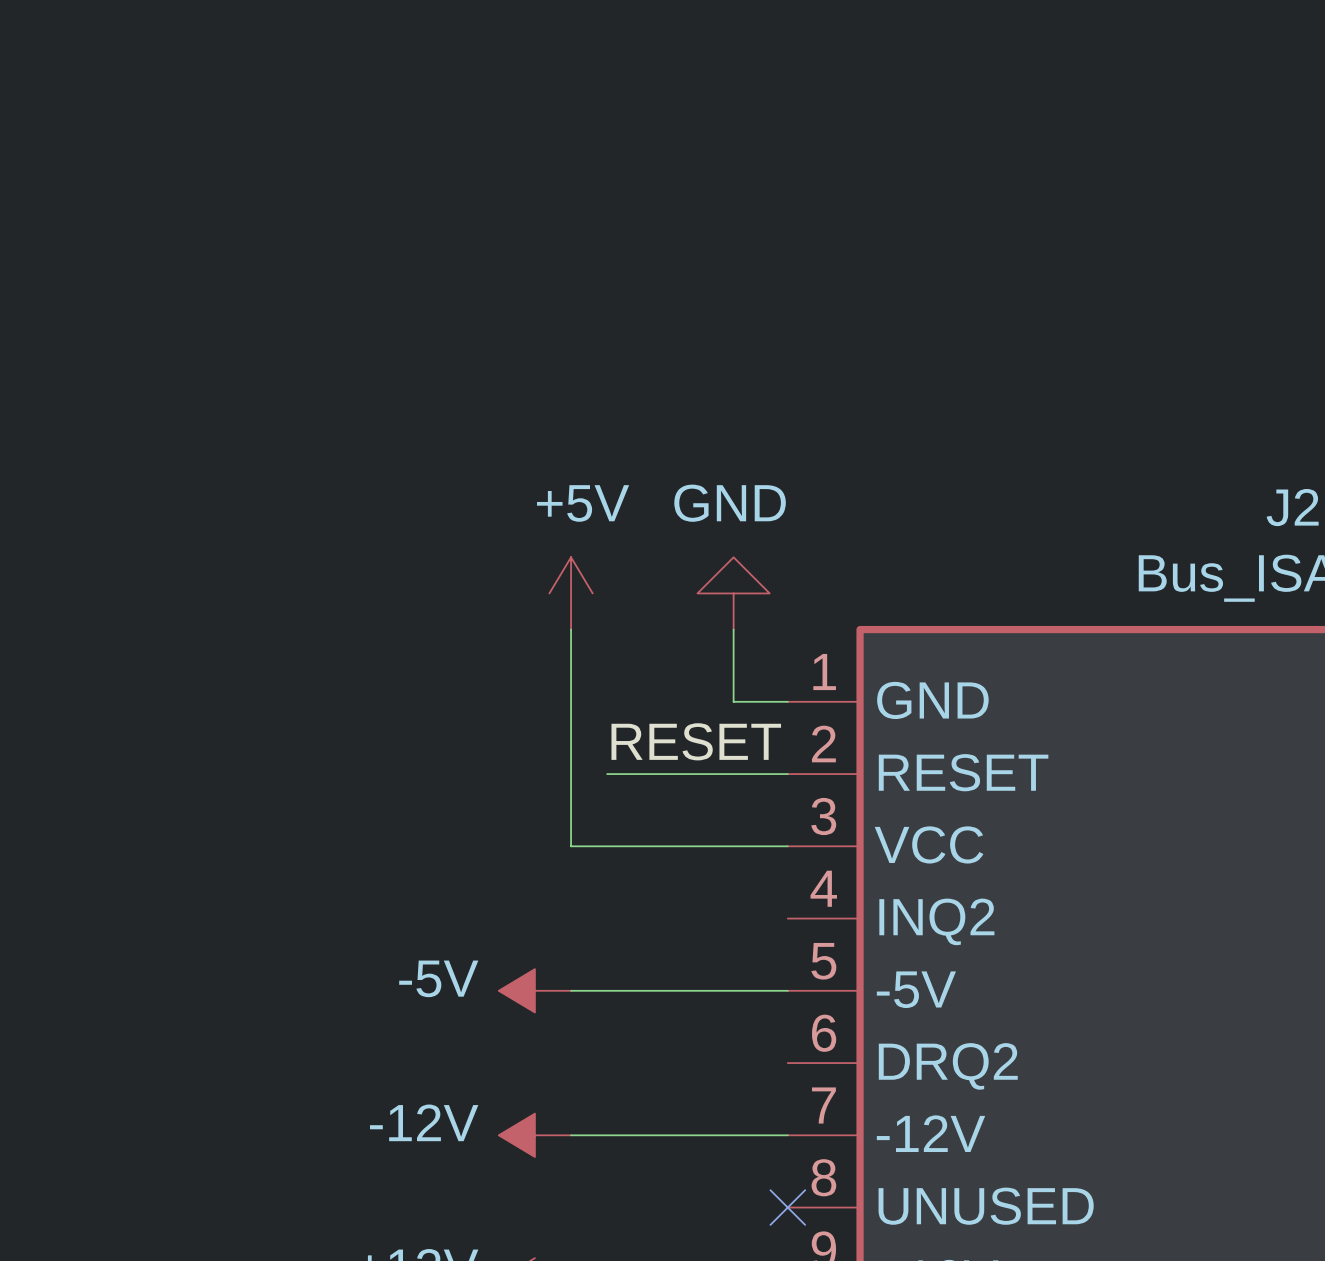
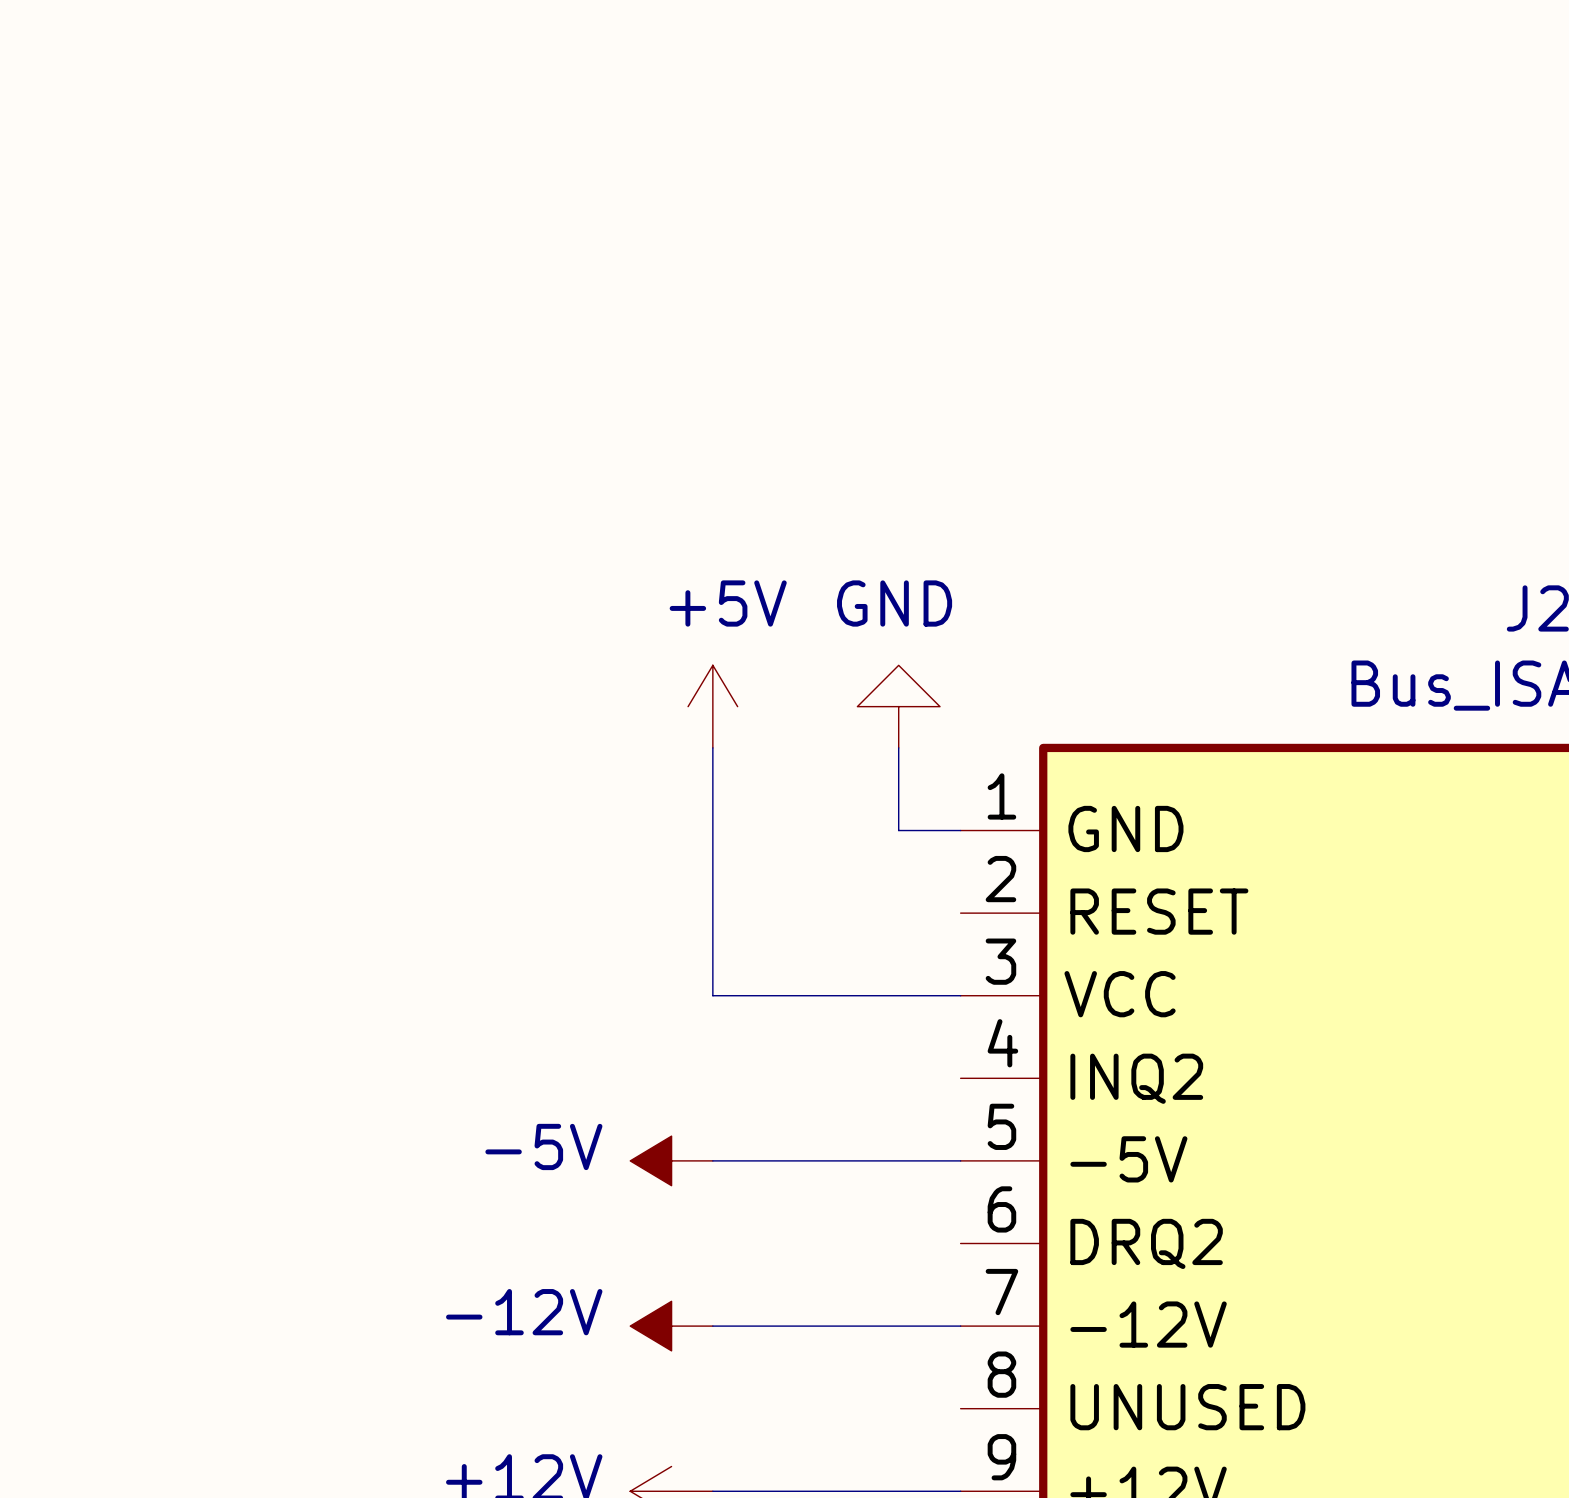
label: RESET (696, 741) -> none
wire: (607, 774) (787, 774) -> none
no-connect mark: (787, 1207) -> none

